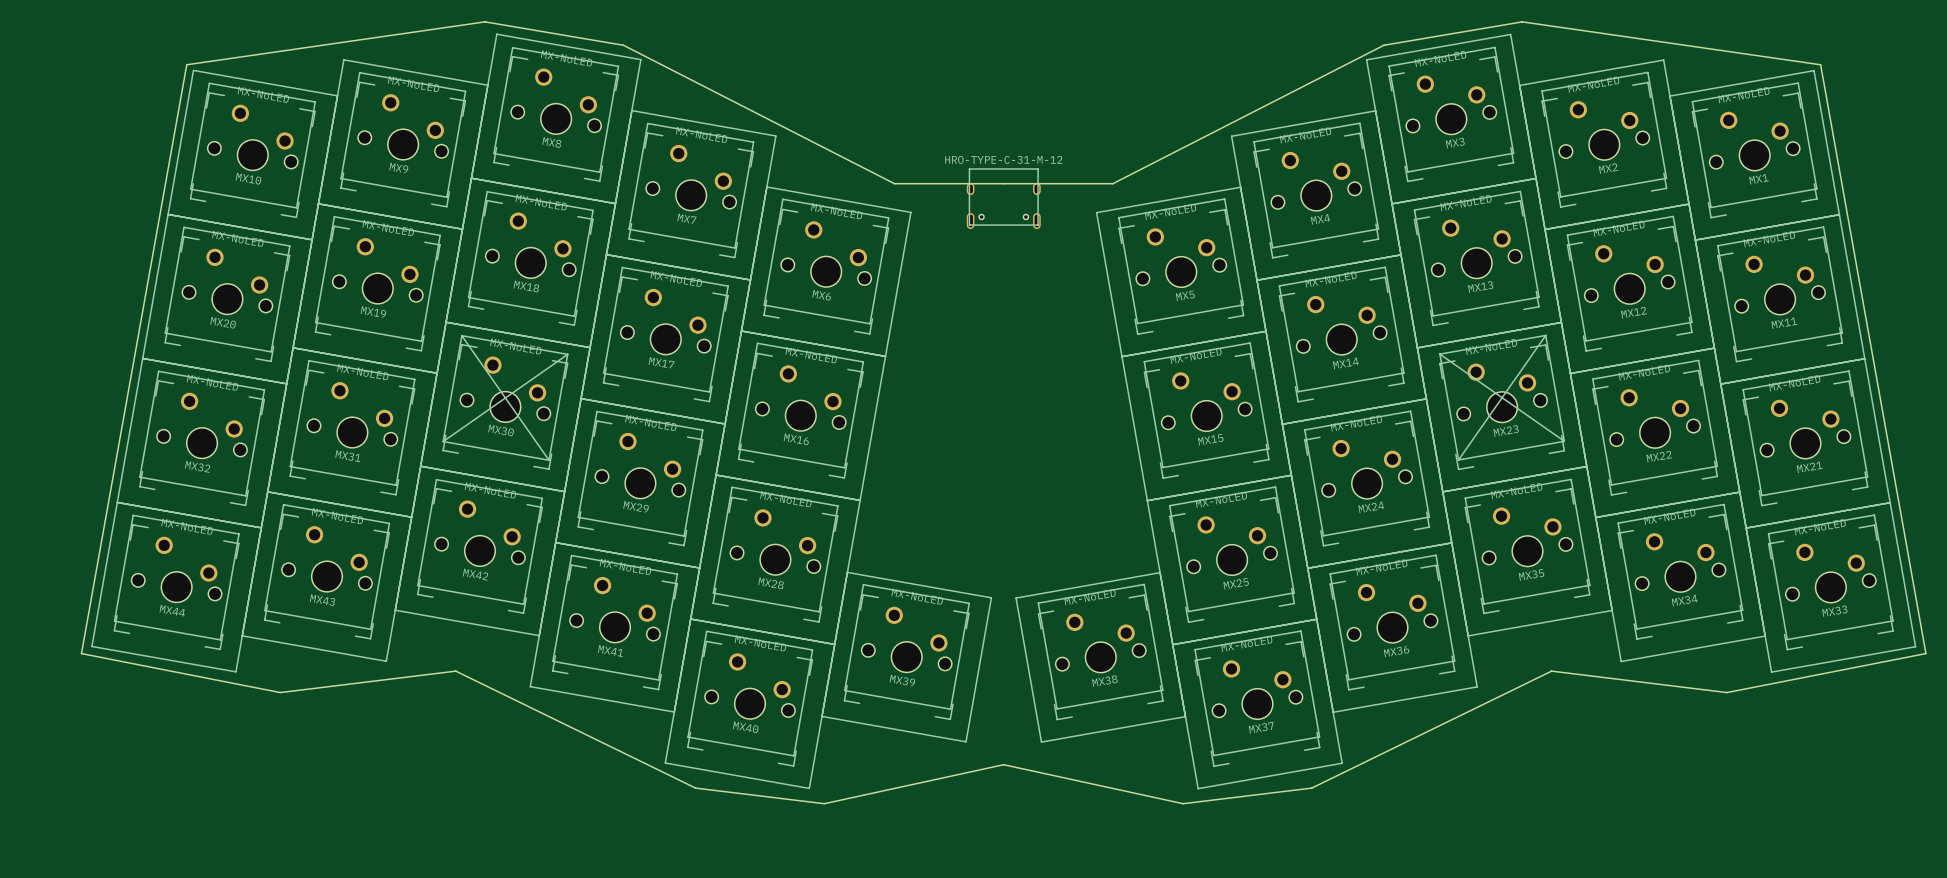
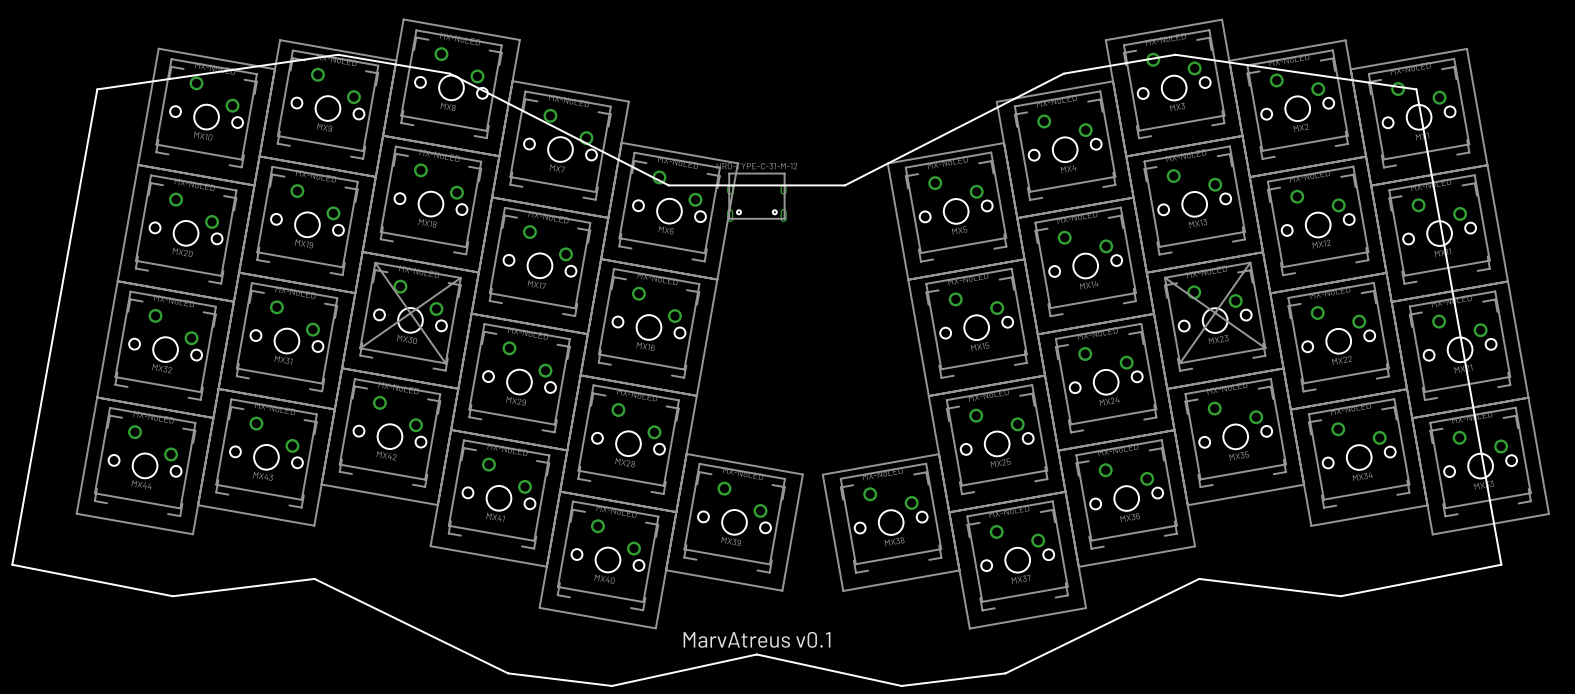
board edge: (485, 21) (623, 45) (894, 183) (1112, 183) (1383, 45) (1522, 21) (1820, 64) (1925, 653) (1727, 692) (1551, 671) (1311, 788) (1183, 803) (1003, 764) (824, 803) (695, 788) (455, 671) (280, 692) (81, 653) (186, 64) (485, 21) -> (338, 54) (449, 73) (668, 185) (845, 185) (1063, 73) (1175, 54) (1416, 89) (1501, 564) (1340, 596) (1199, 578) (1005, 673) (901, 685) (756, 654) (612, 685) (508, 673) (314, 578) (172, 596) (12, 564) (97, 89) (338, 54)
part position: (1003, 198) -> (756, 197)
text: none -> MarvAtreus v0.1 (757, 639)

